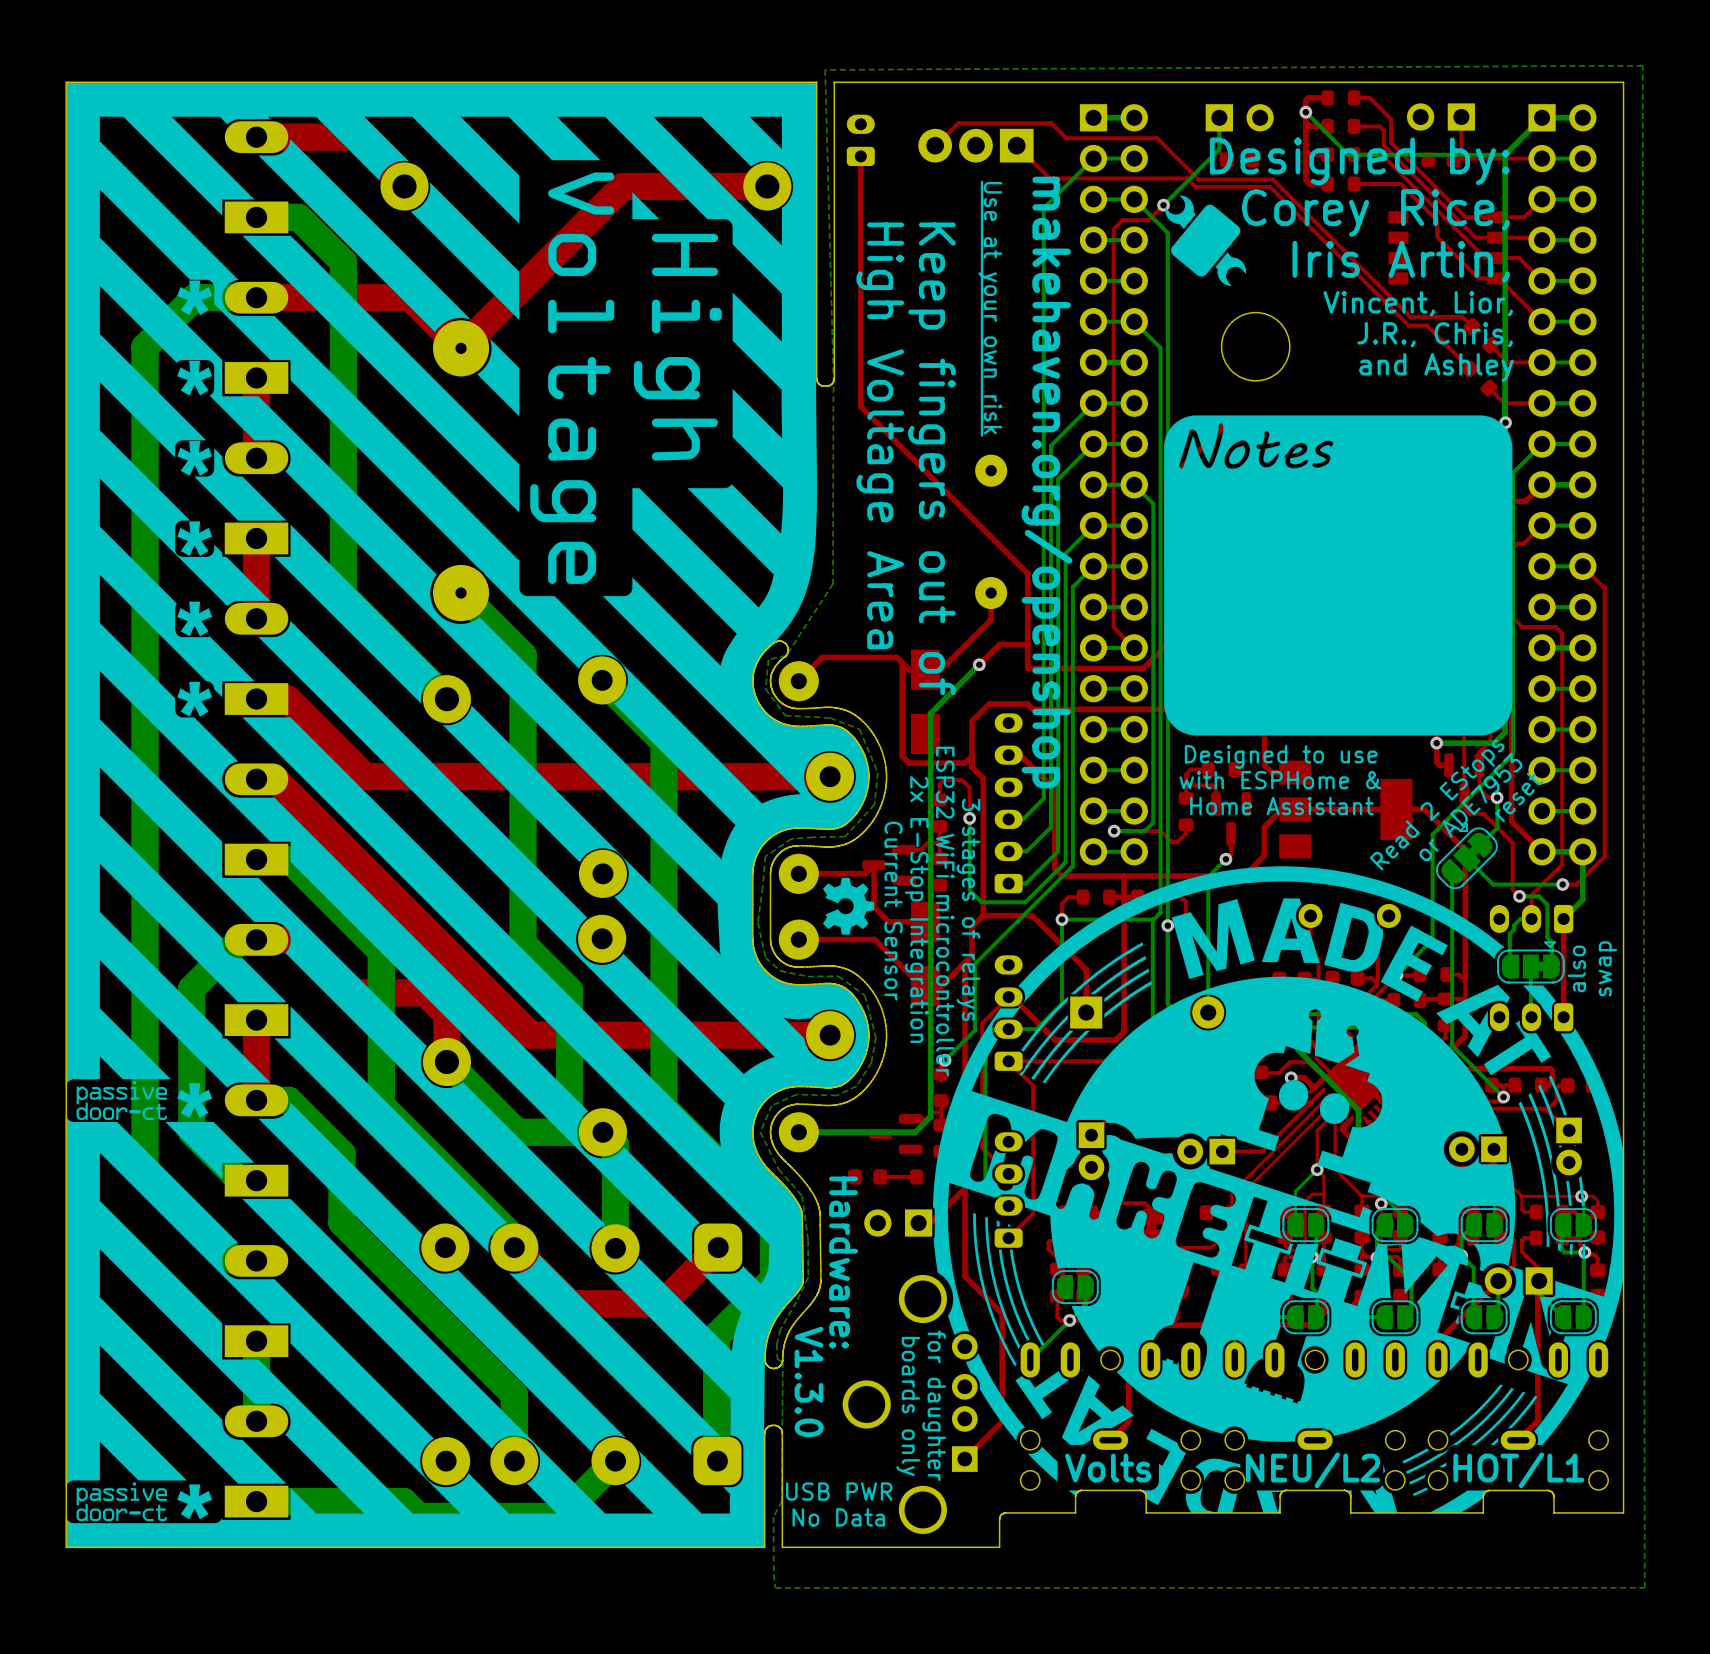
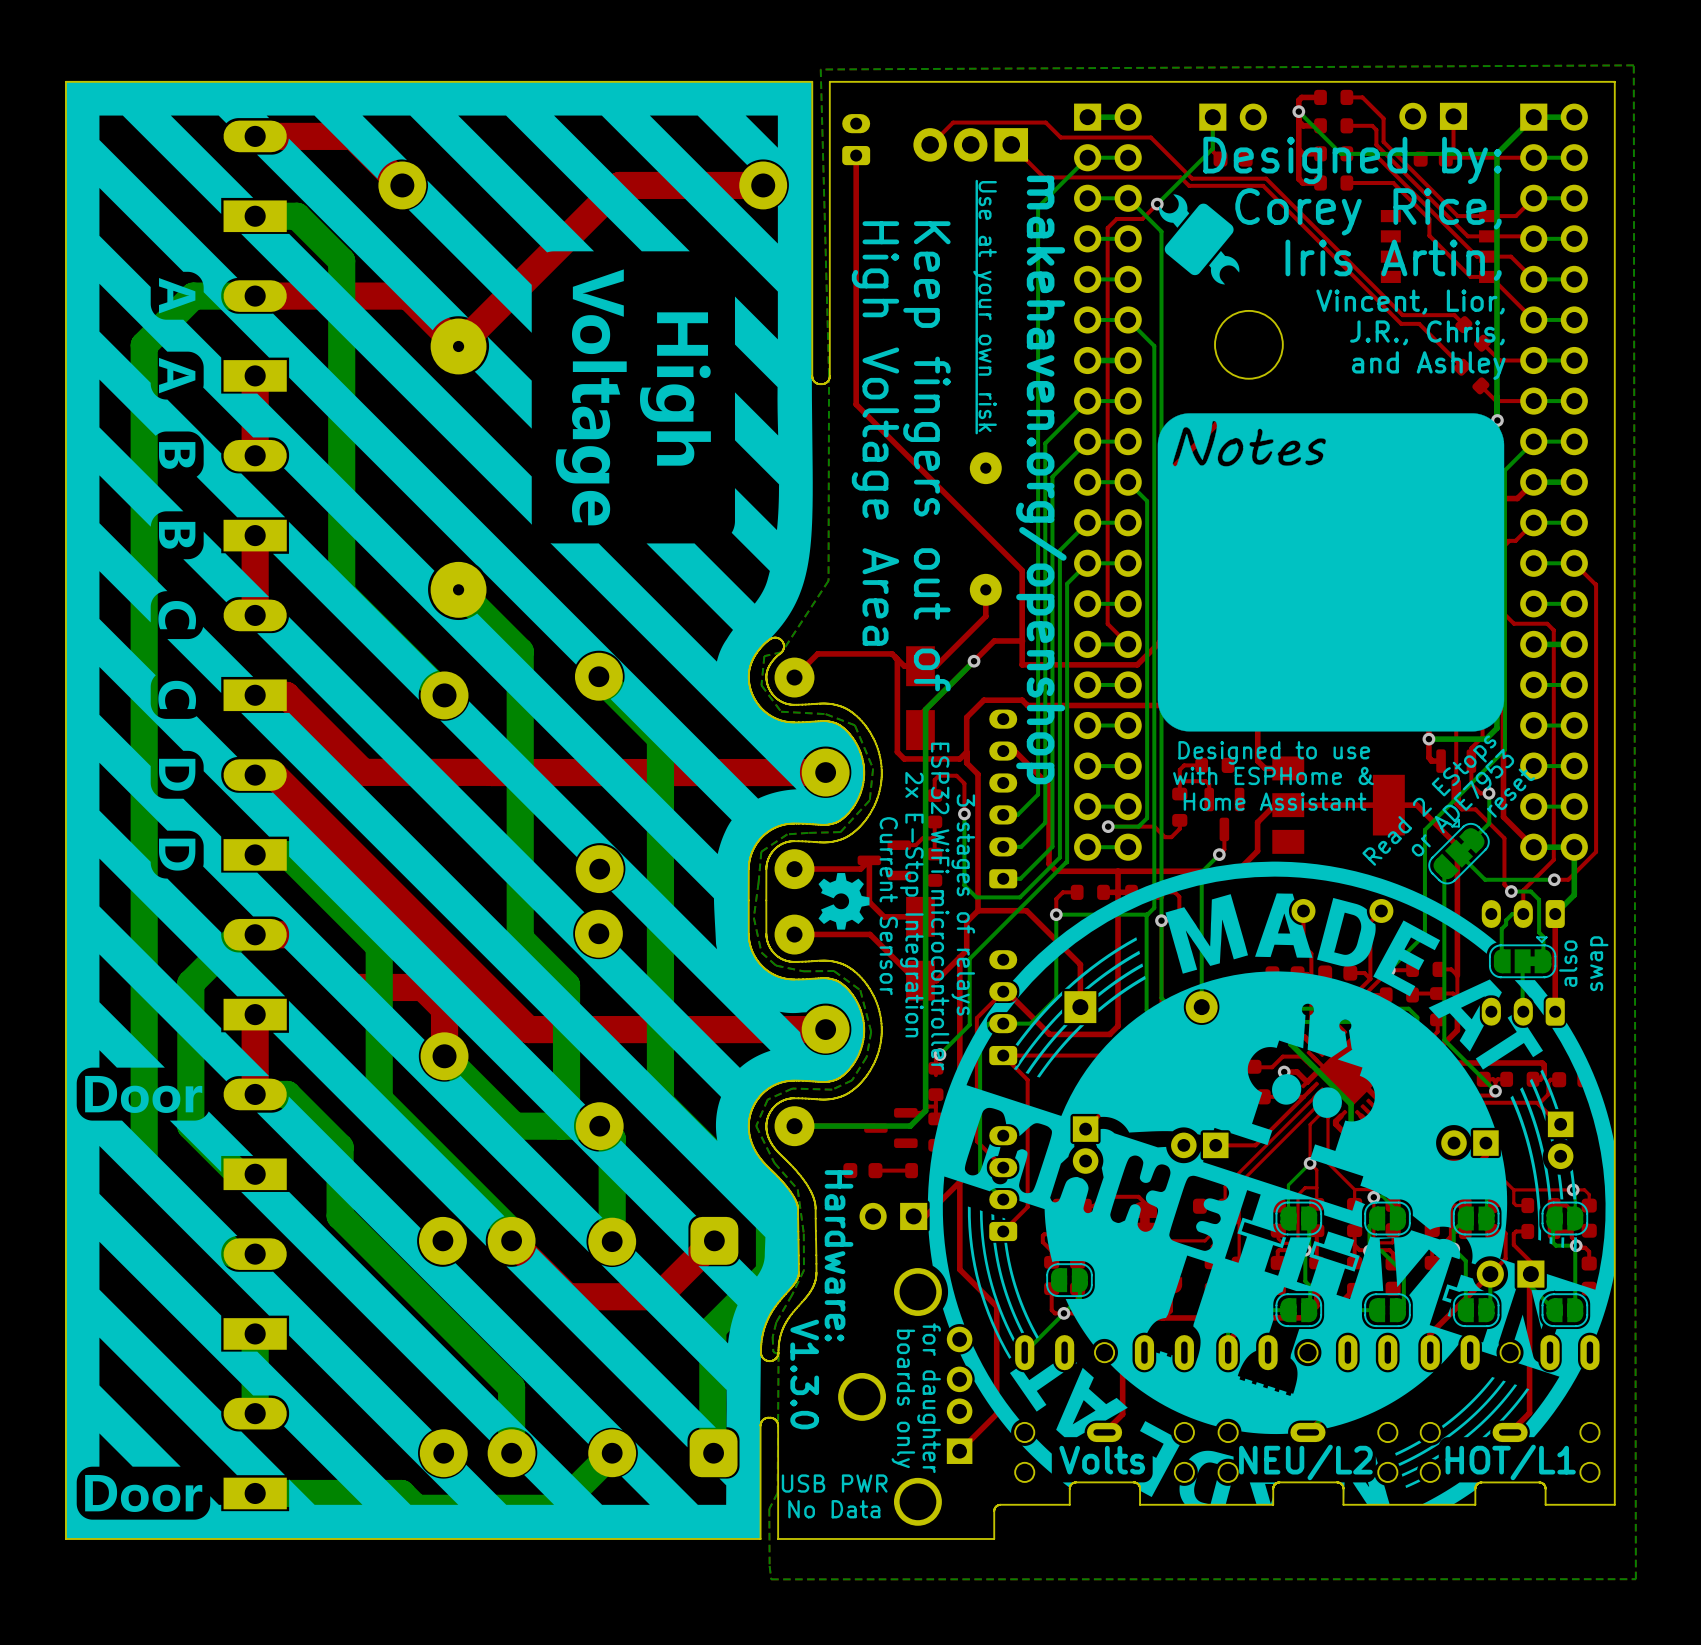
drawing shape: [65, 82, 869, 1548] -> [65, 81, 865, 1539]
drawing: [548, 172, 719, 277] -> none
drawing shape: [410, 181, 520, 320] -> [408, 180, 532, 333]
drawing shape: [242, 235, 520, 513] -> [241, 233, 533, 525]
drawing: none -> [555, 269, 711, 526]
drawing: none -> [158, 278, 196, 314]
drawing: [177, 280, 213, 316] -> none
drawing: [548, 299, 615, 334] -> none
drawing: [652, 299, 722, 334] -> none
drawing shape: [477, 338, 520, 417] -> [474, 336, 532, 429]
drawing: [548, 356, 611, 400] -> none
drawing shape: [633, 356, 701, 400] -> [657, 366, 694, 378]
drawing: none -> [158, 357, 196, 394]
drawing: [177, 360, 213, 396] -> none
drawing: [548, 418, 597, 461] -> none
drawing shape: [651, 418, 718, 461] -> [657, 431, 711, 466]
drawing: [177, 441, 287, 557] -> none
drawing: none -> [158, 442, 196, 469]
drawing: [530, 480, 597, 523] -> none
drawing: none -> [158, 521, 270, 710]
drawing: [548, 541, 597, 584] -> none
drawing: [177, 601, 213, 637] -> none
drawing: [177, 681, 213, 717] -> none
drawing: none -> [159, 758, 196, 791]
drawing: none -> [158, 838, 196, 871]
drawing: [76, 1081, 168, 1121] -> none
drawing: none -> [85, 1075, 181, 1113]
drawing shape: [177, 1083, 213, 1119] -> [185, 1085, 203, 1113]
drawing shape: [165, 1121, 255, 1179] -> [169, 1111, 254, 1172]
drawing: [76, 1482, 168, 1522] -> none
drawing: none -> [85, 1474, 181, 1512]
drawing shape: [177, 1484, 213, 1520] -> [185, 1484, 203, 1512]

